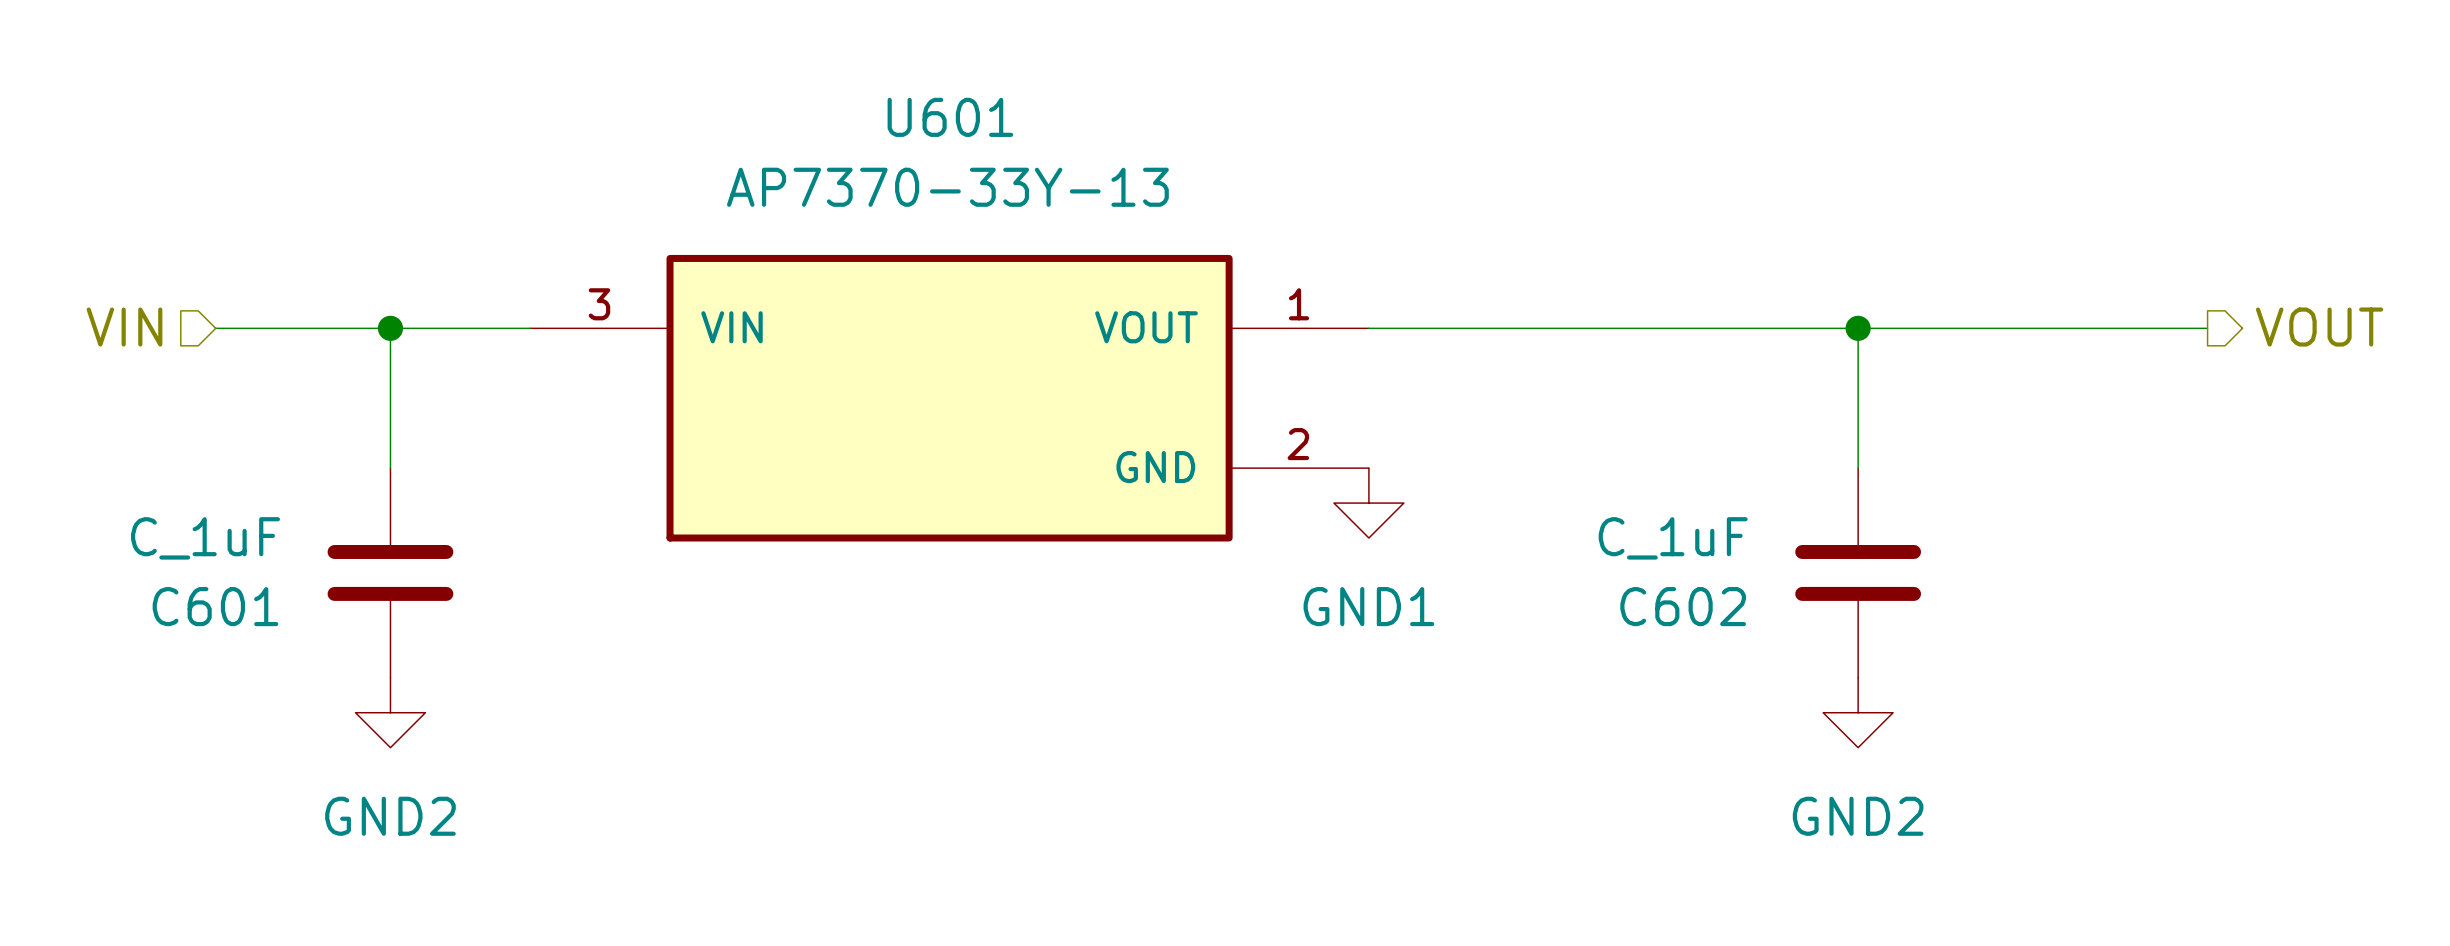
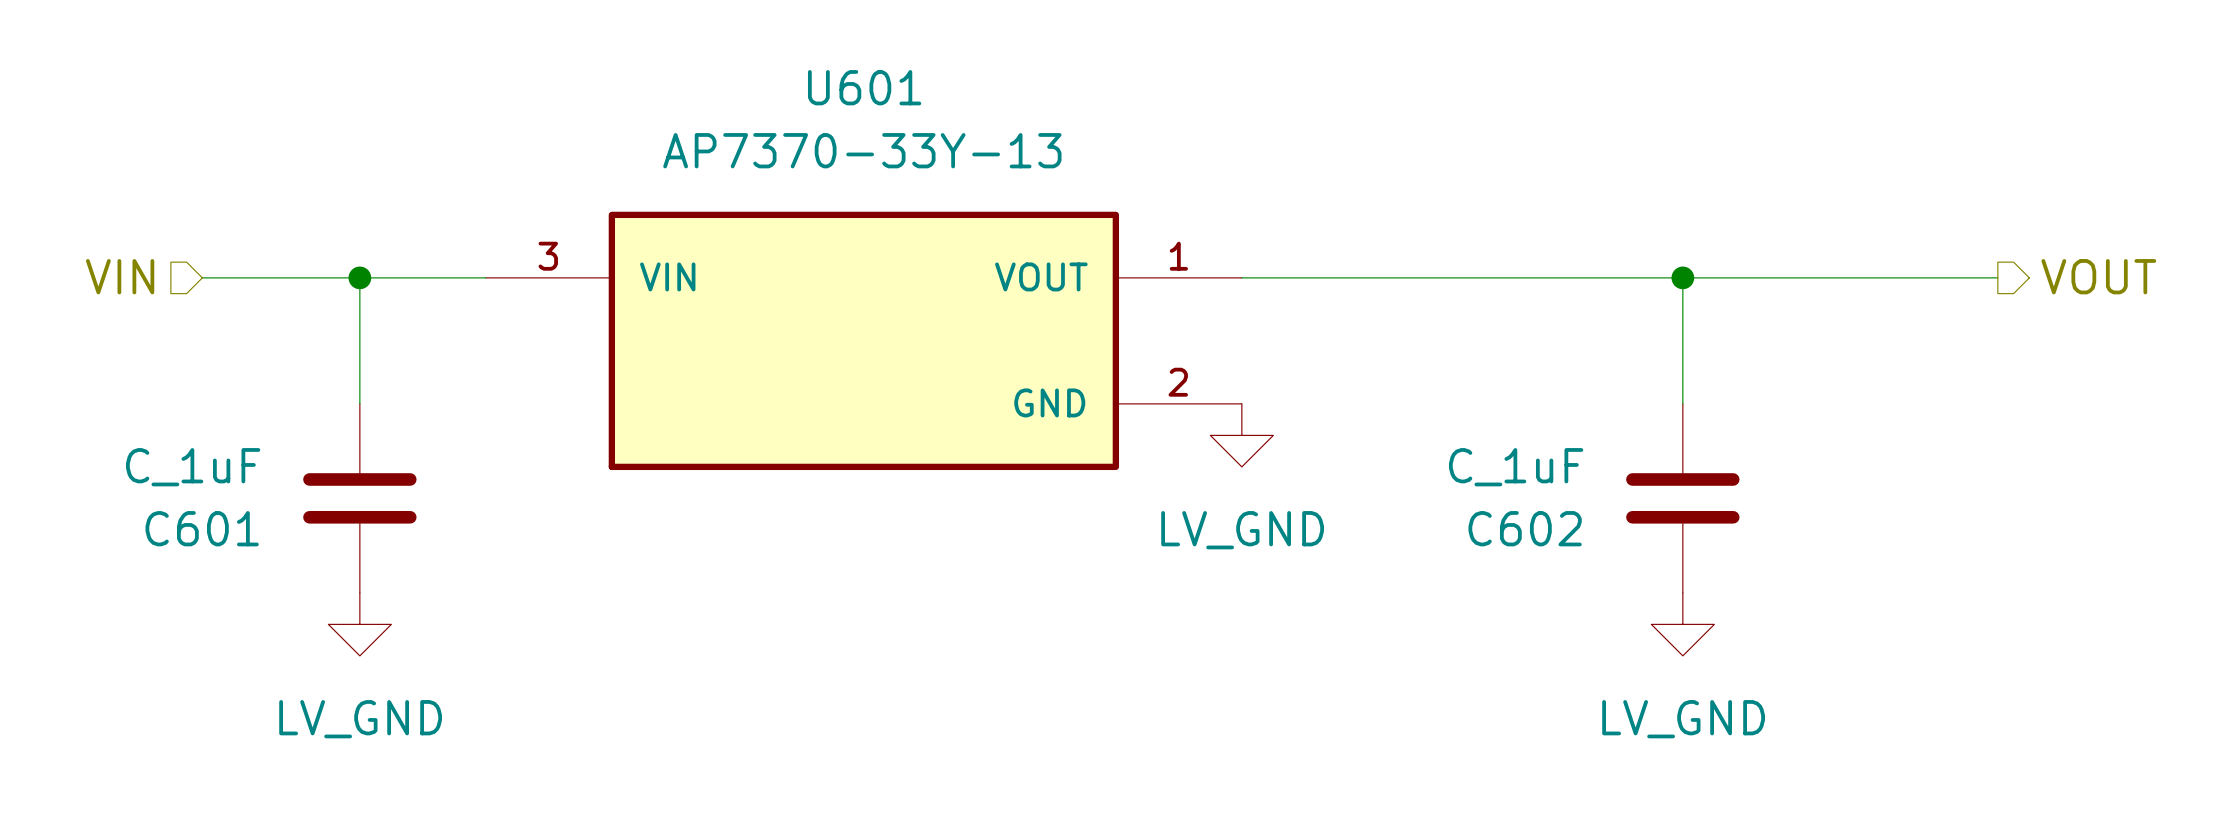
power symbol: GND1 (1368, 503) -> LV_GND (1241, 435)
power symbol: GND2 (390, 712) -> LV_GND (359, 624)
power symbol: GND2 (1858, 712) -> LV_GND (1682, 624)

